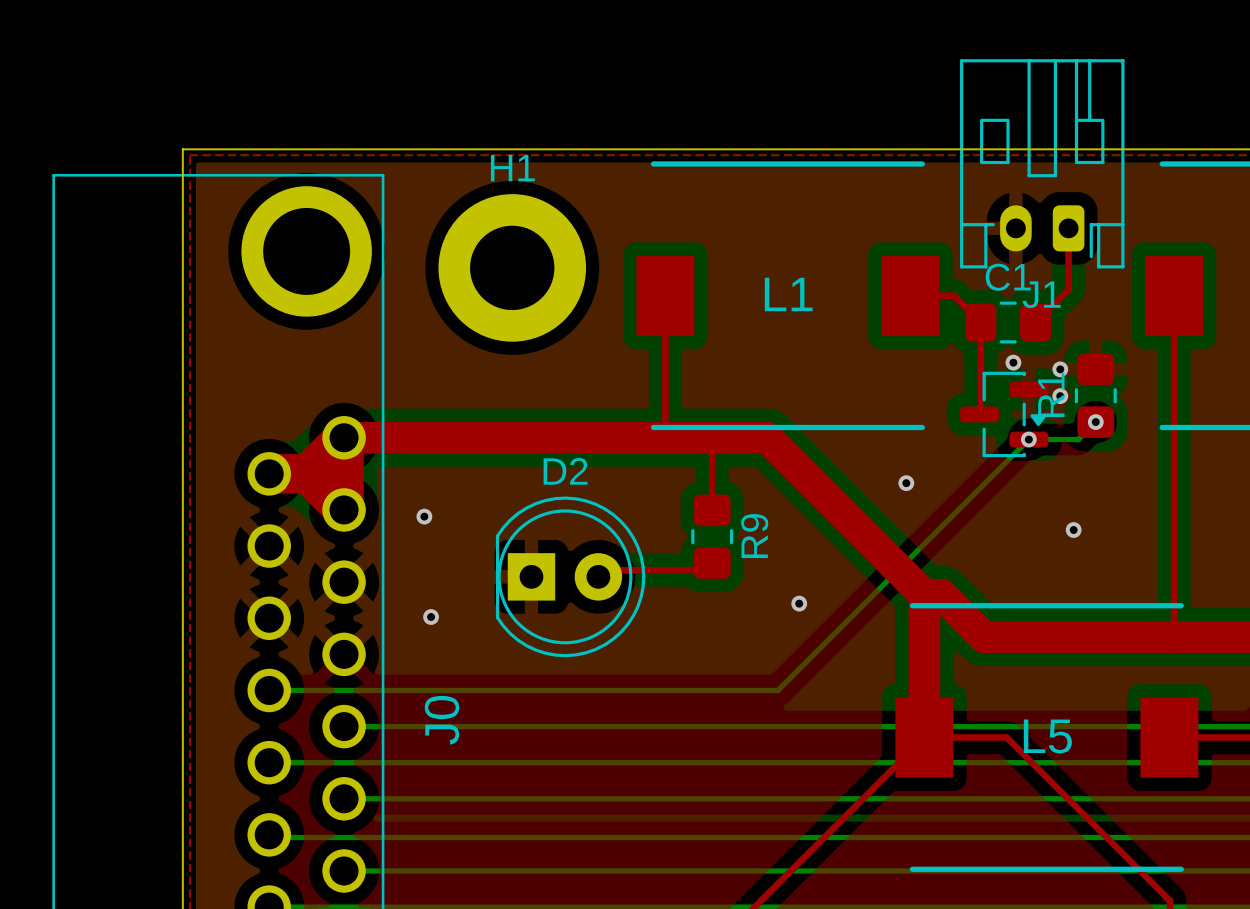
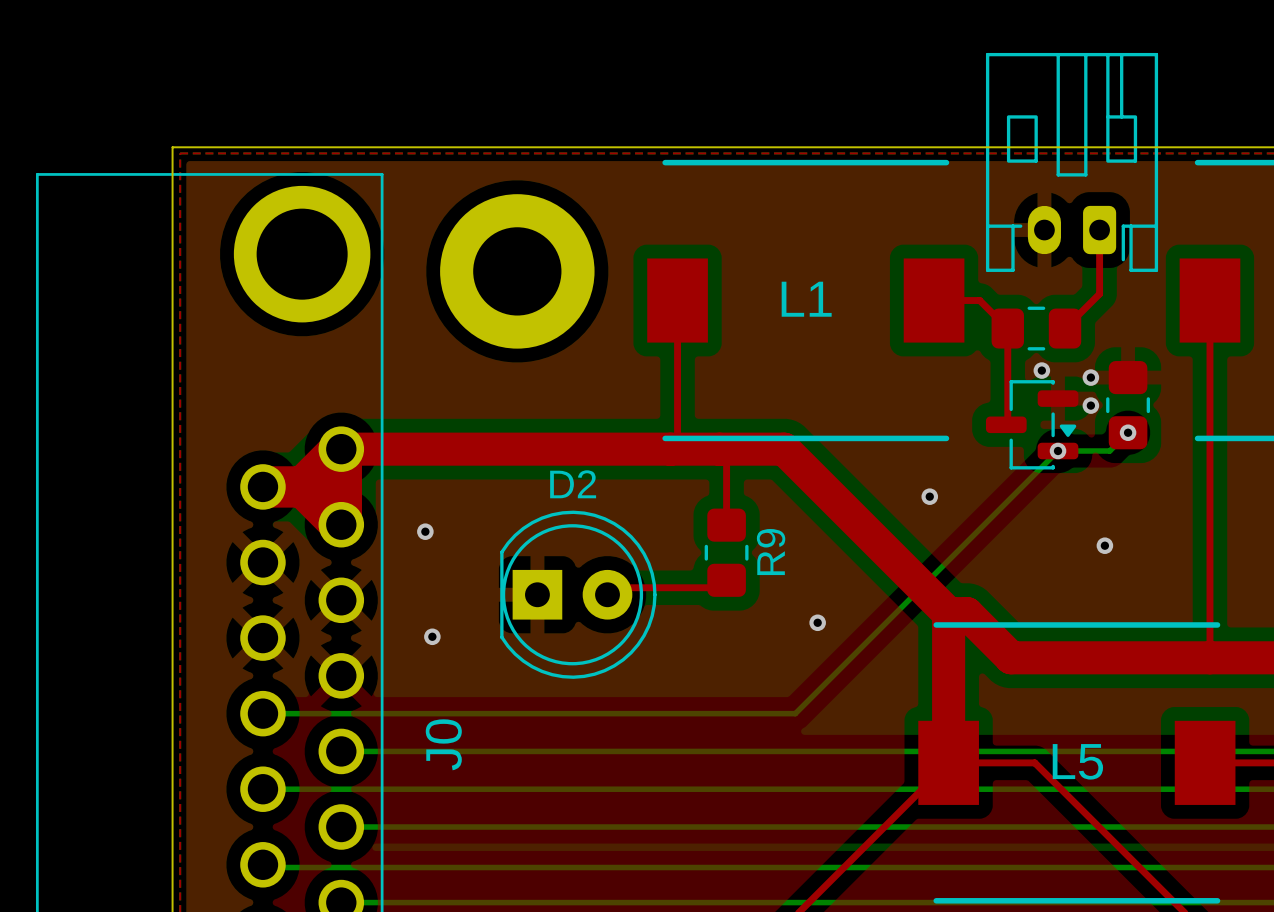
H1 name: H1 (512, 168) -> none
C1 name: C1 (1008, 277) -> none
J1 name: J1 (1041, 294) -> none
R1 name: R1 (1051, 395) -> none

